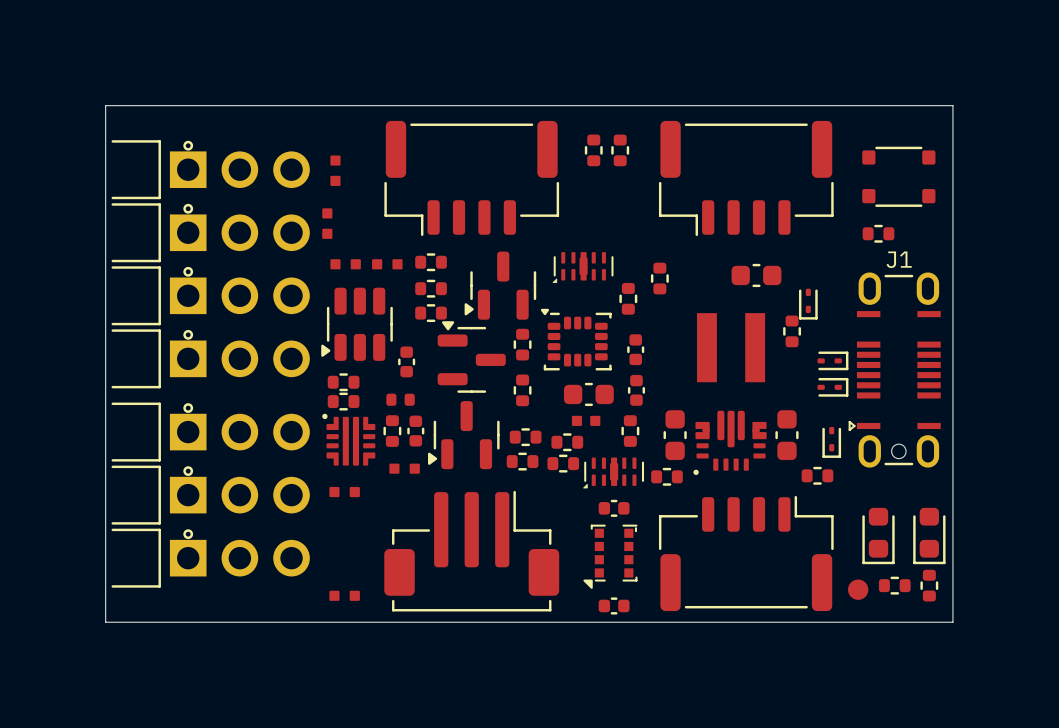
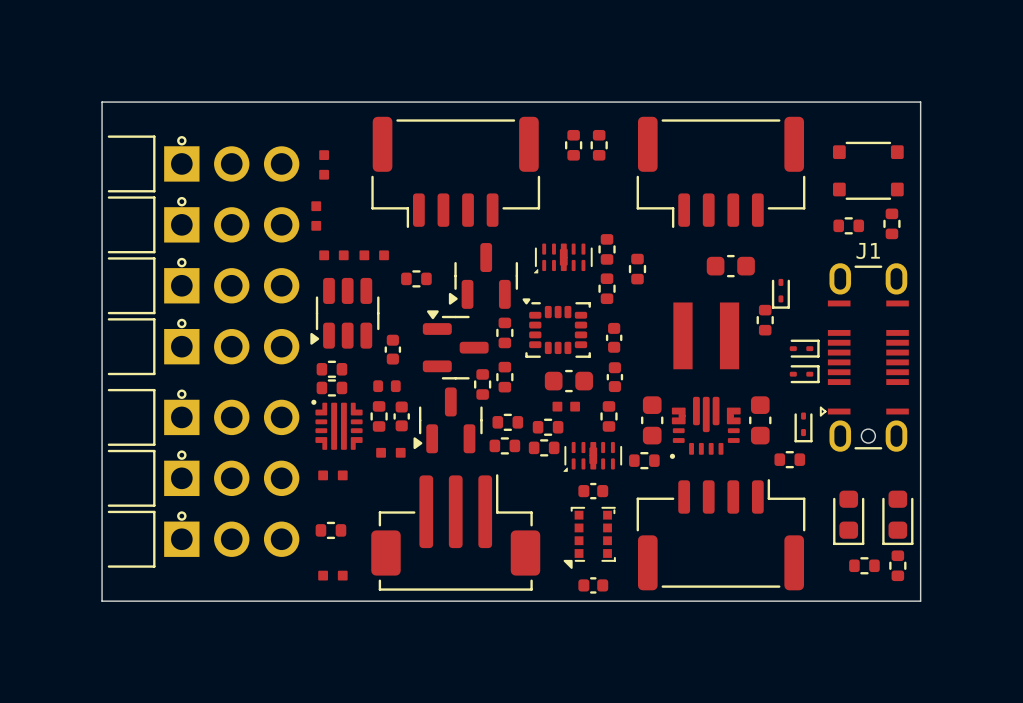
part: none -> (891, 223)
part: none -> (607, 249)
part: (431, 262) -> none
part: (431, 313) -> none
part: none -> (482, 384)
part: none -> (330, 530)
part: (858, 589) -> none

